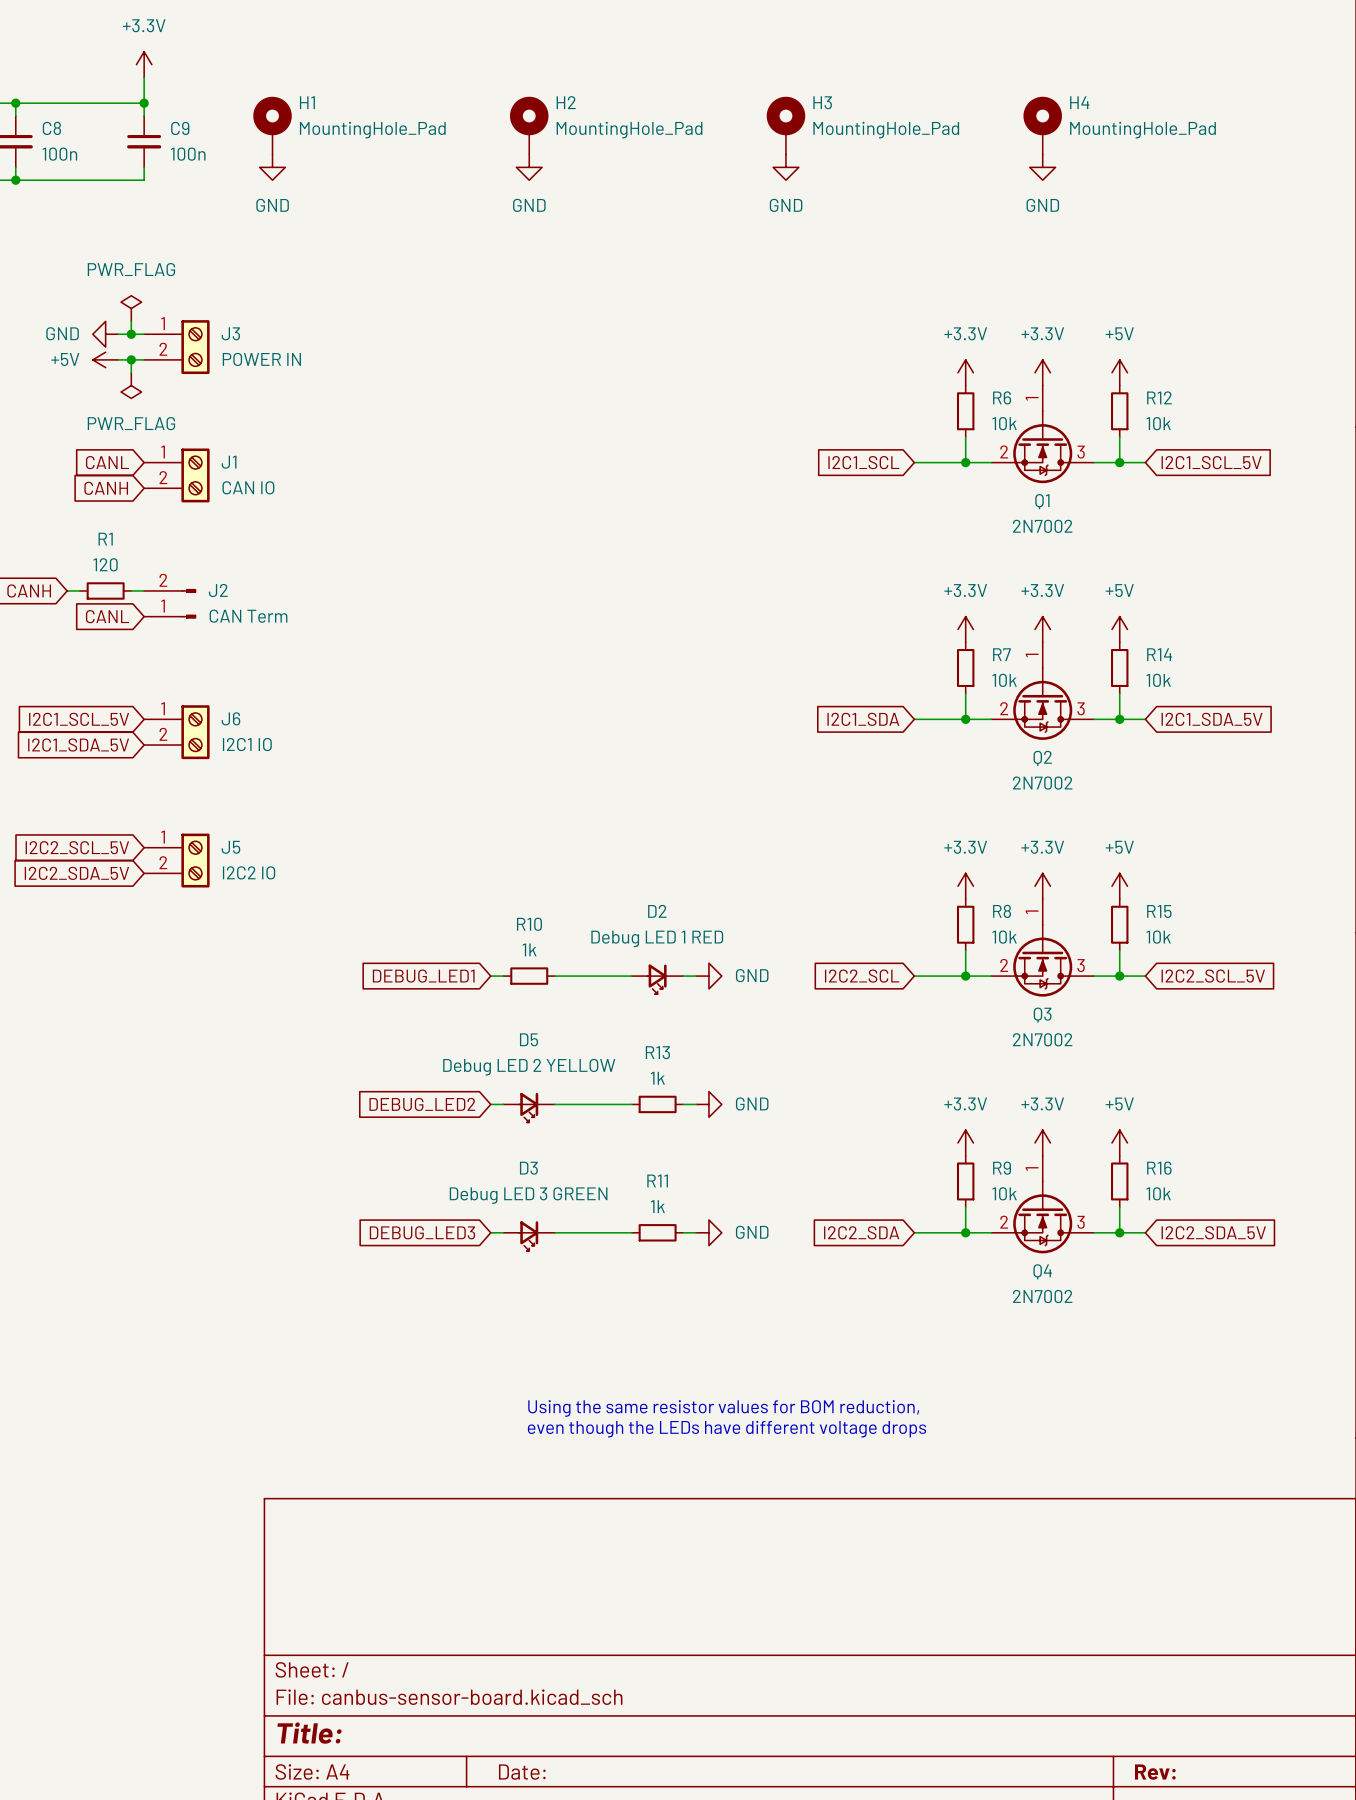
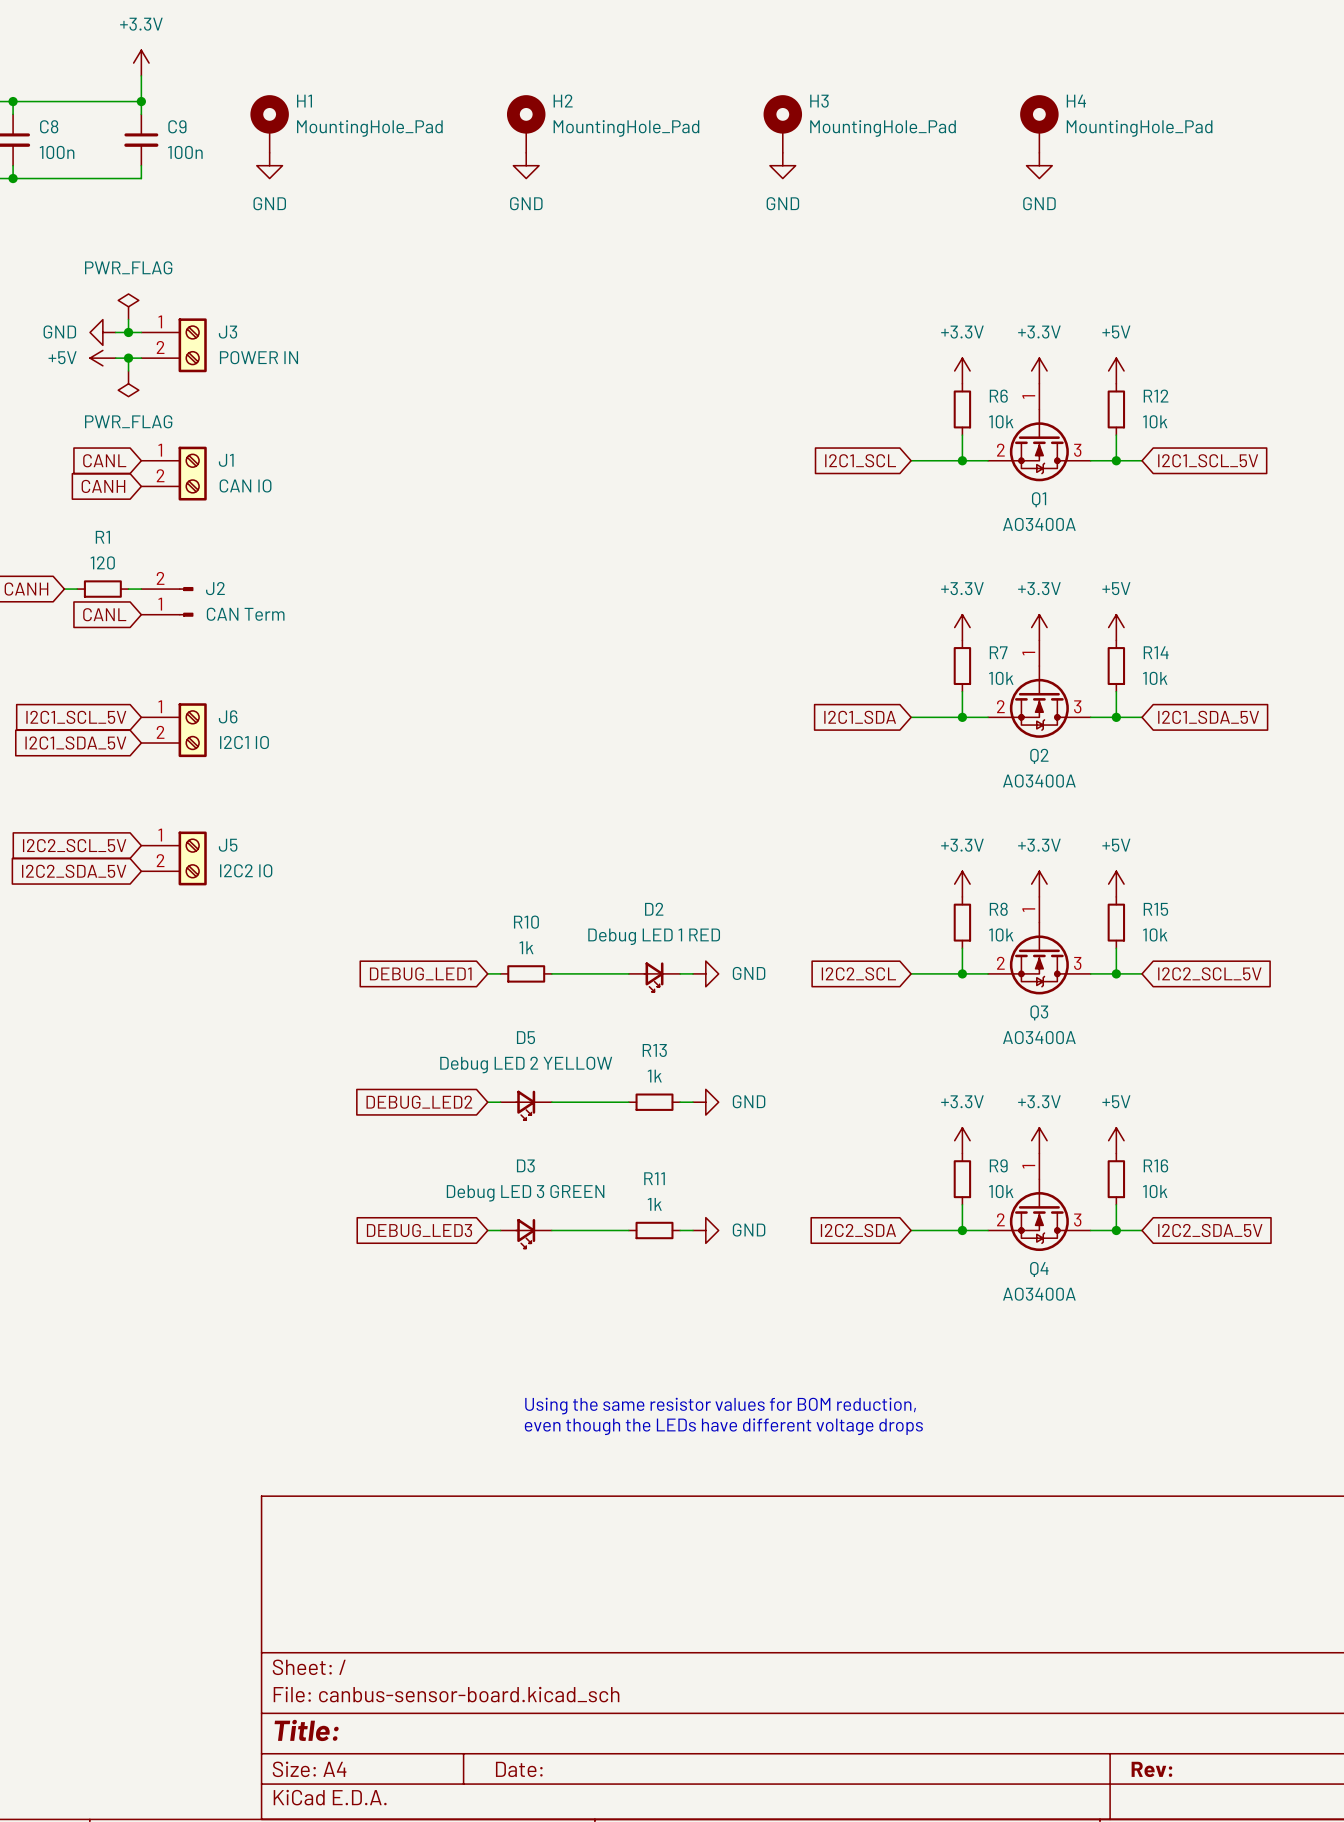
Q1 value: 2N7002 (1042, 526) -> AO3400A (1039, 524)
Q2 value: 2N7002 (1042, 783) -> AO3400A (1039, 781)
Q3 value: 2N7002 (1042, 1039) -> AO3400A (1039, 1037)
Q4 value: 2N7002 (1042, 1296) -> AO3400A (1039, 1294)

